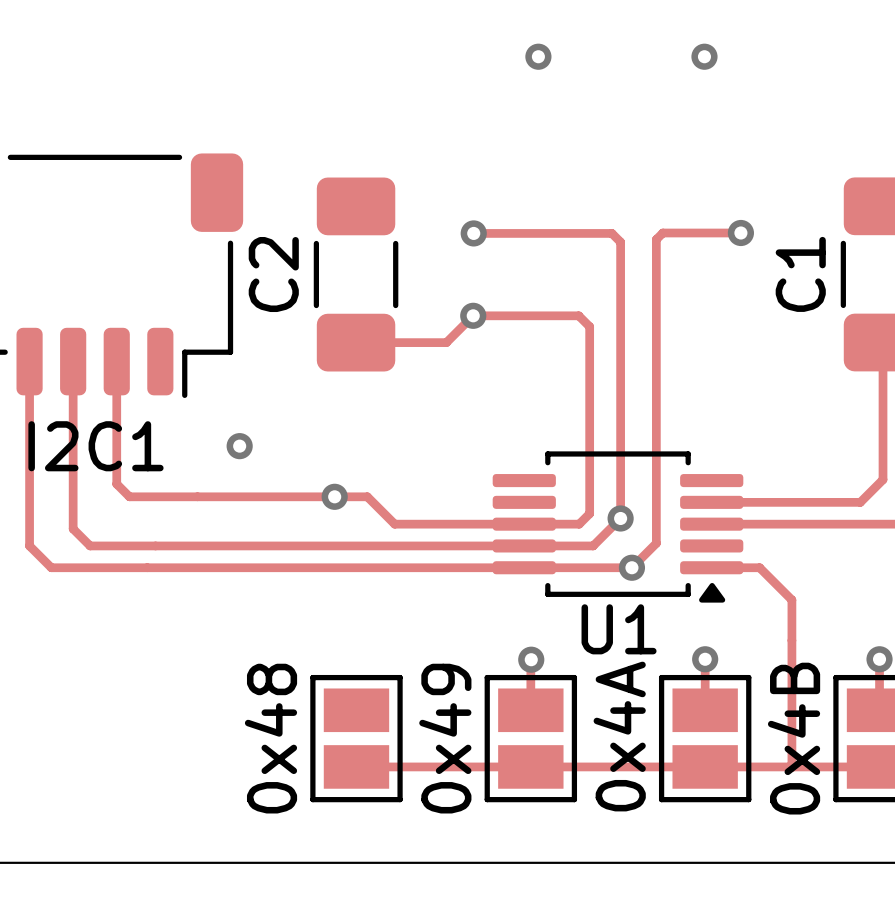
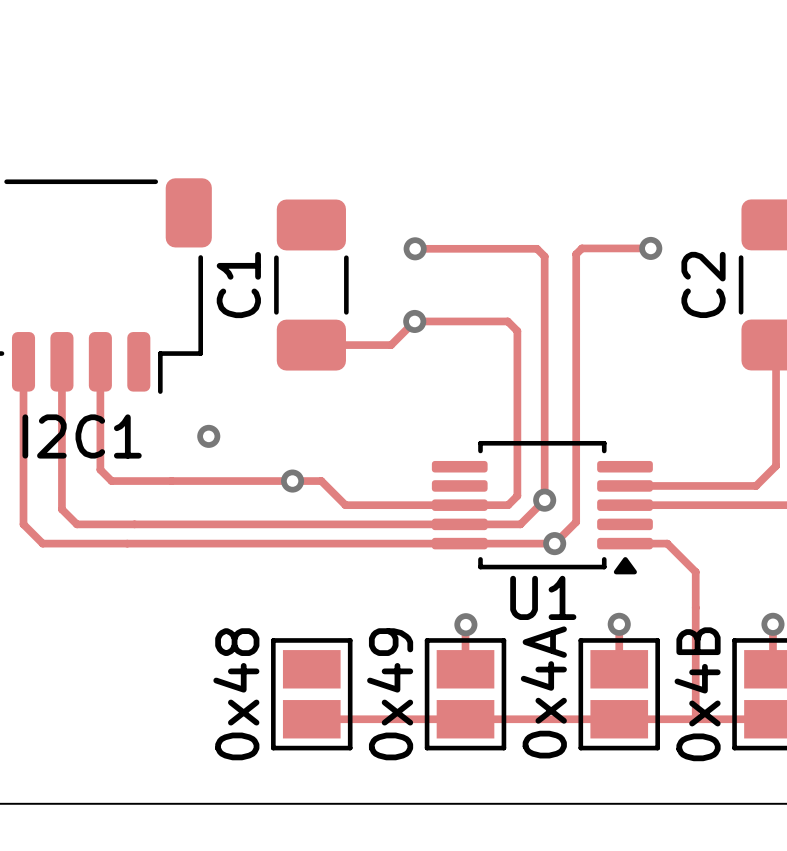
via: (538, 56) -> none
via: (704, 56) -> none
C2 name: C2 (273, 274) -> C1 (238, 285)
C1 name: C1 (800, 274) -> C2 (703, 284)

